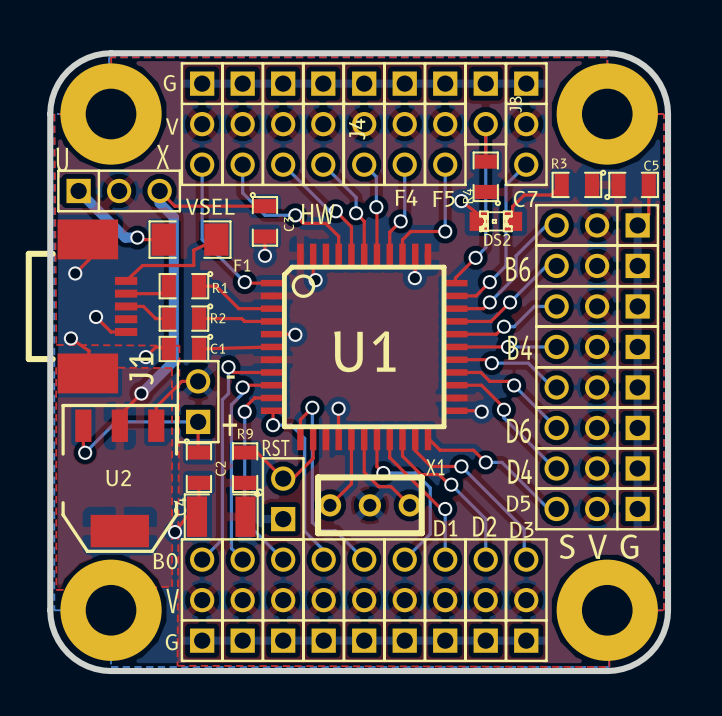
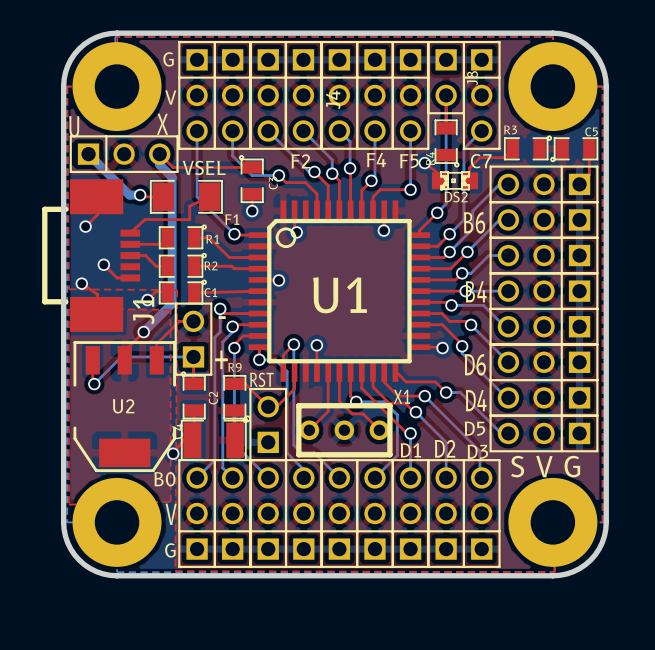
text: HW (318, 213) -> F2 (300, 161)

